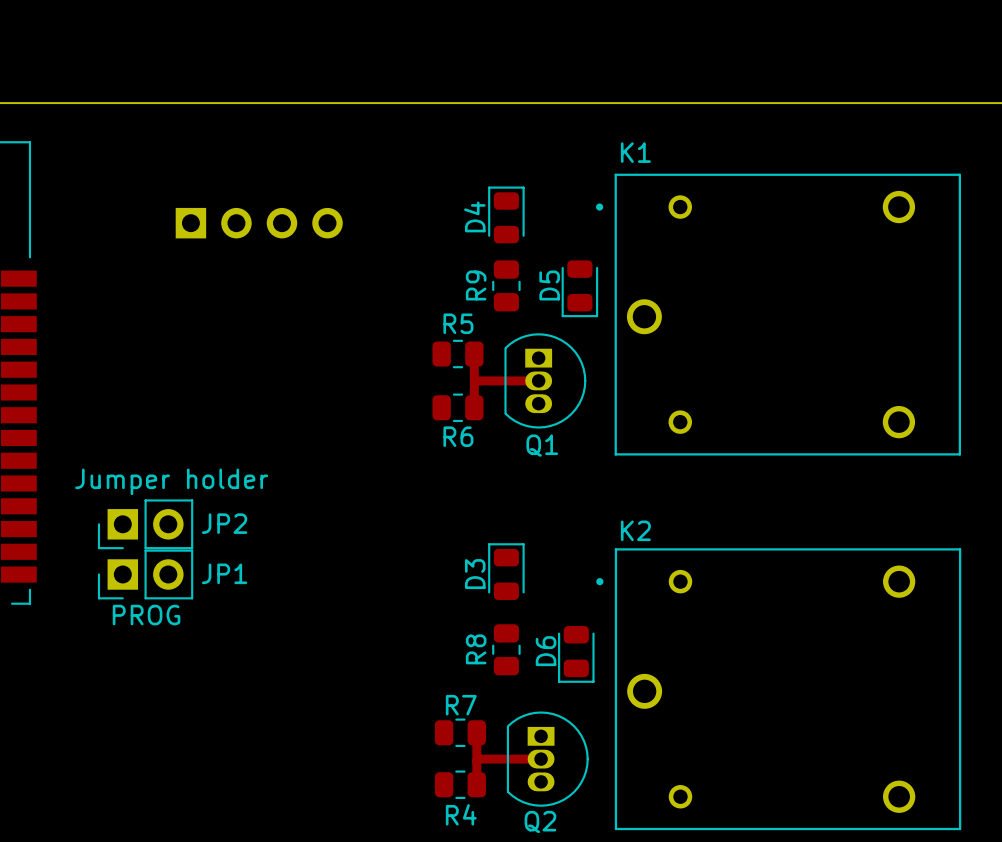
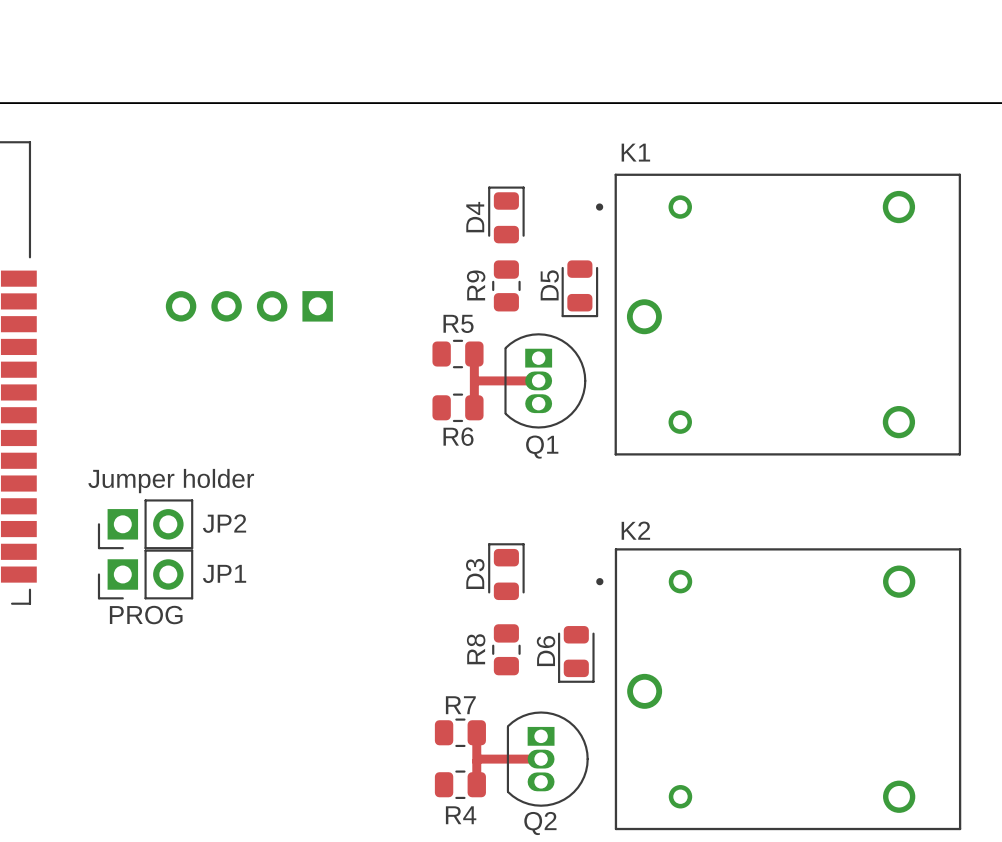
part rotation: 0° (259, 223) -> 180° (249, 306)

